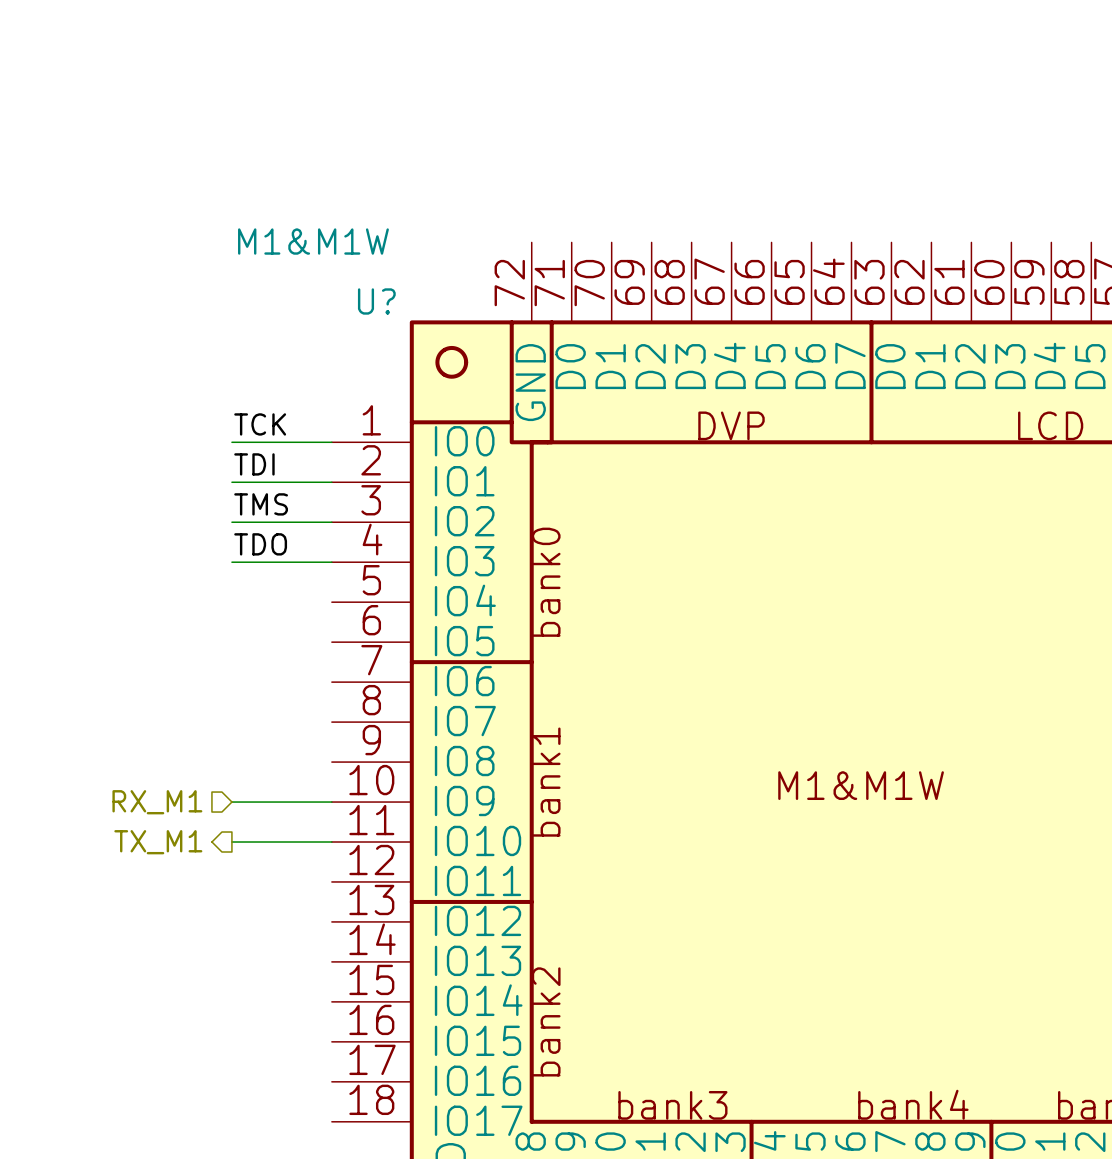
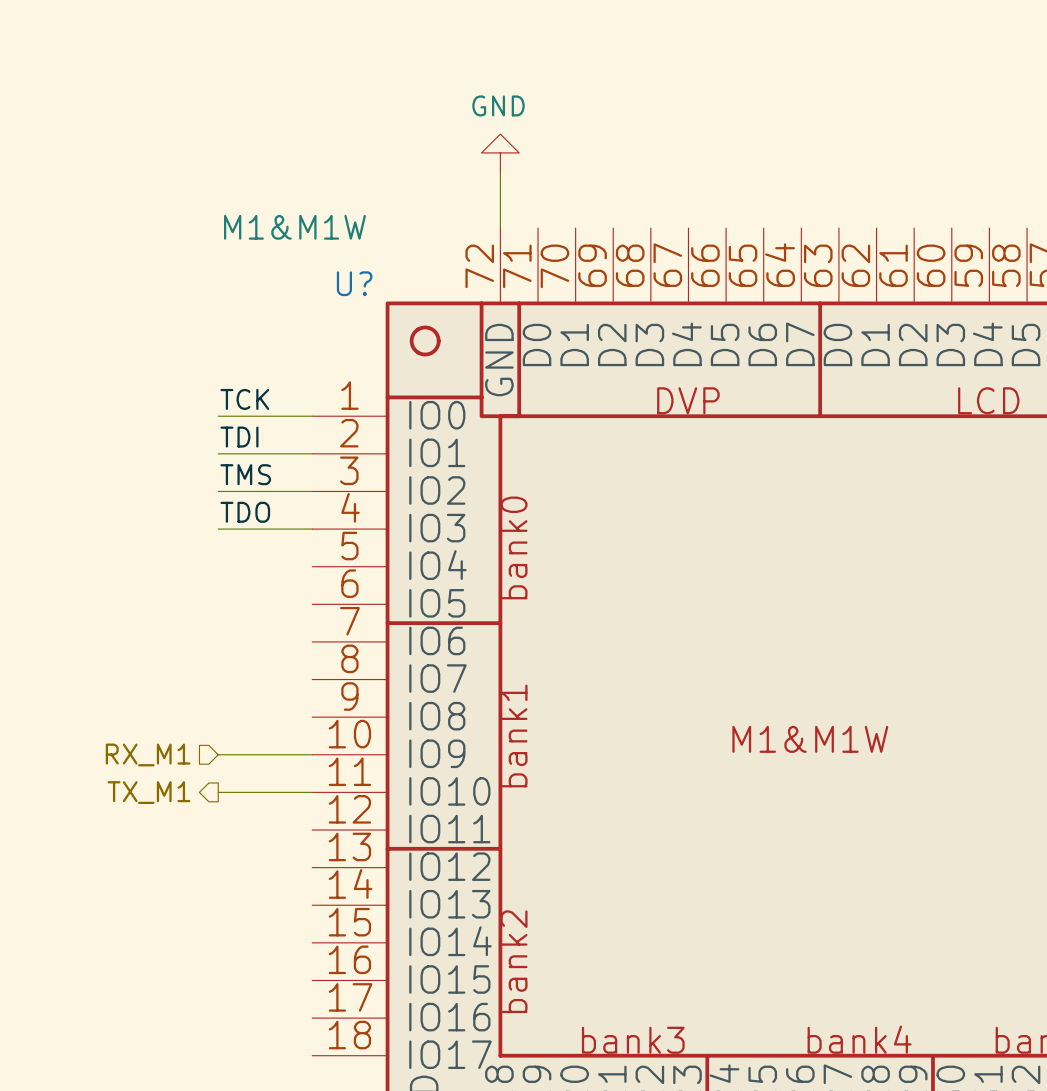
power symbol: none -> GND (500, 152)
wire: none -> (500, 171) (500, 228)

